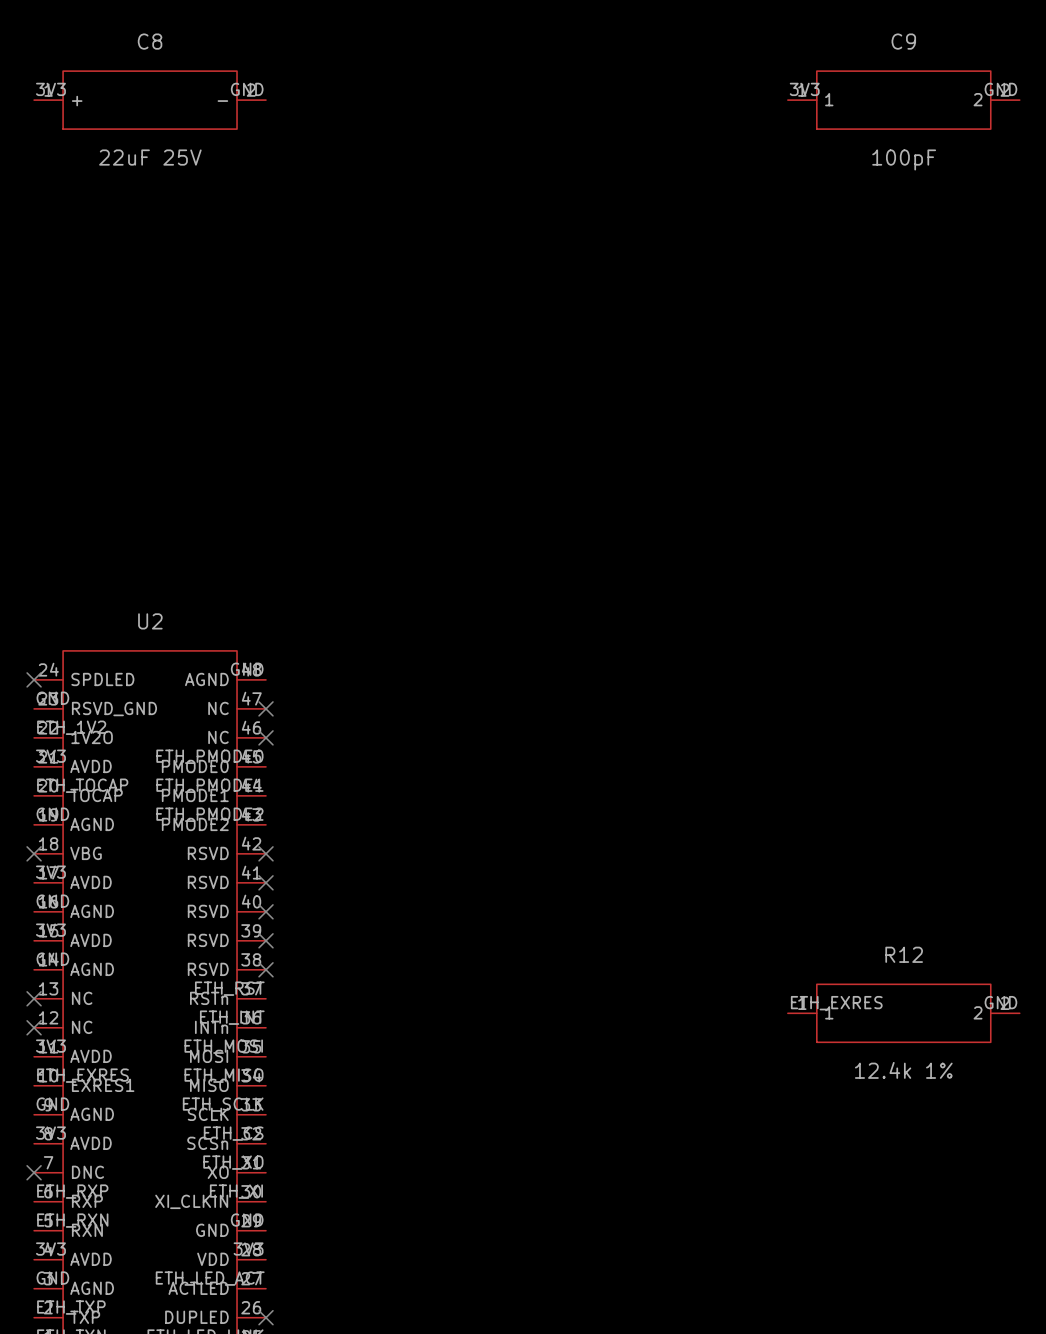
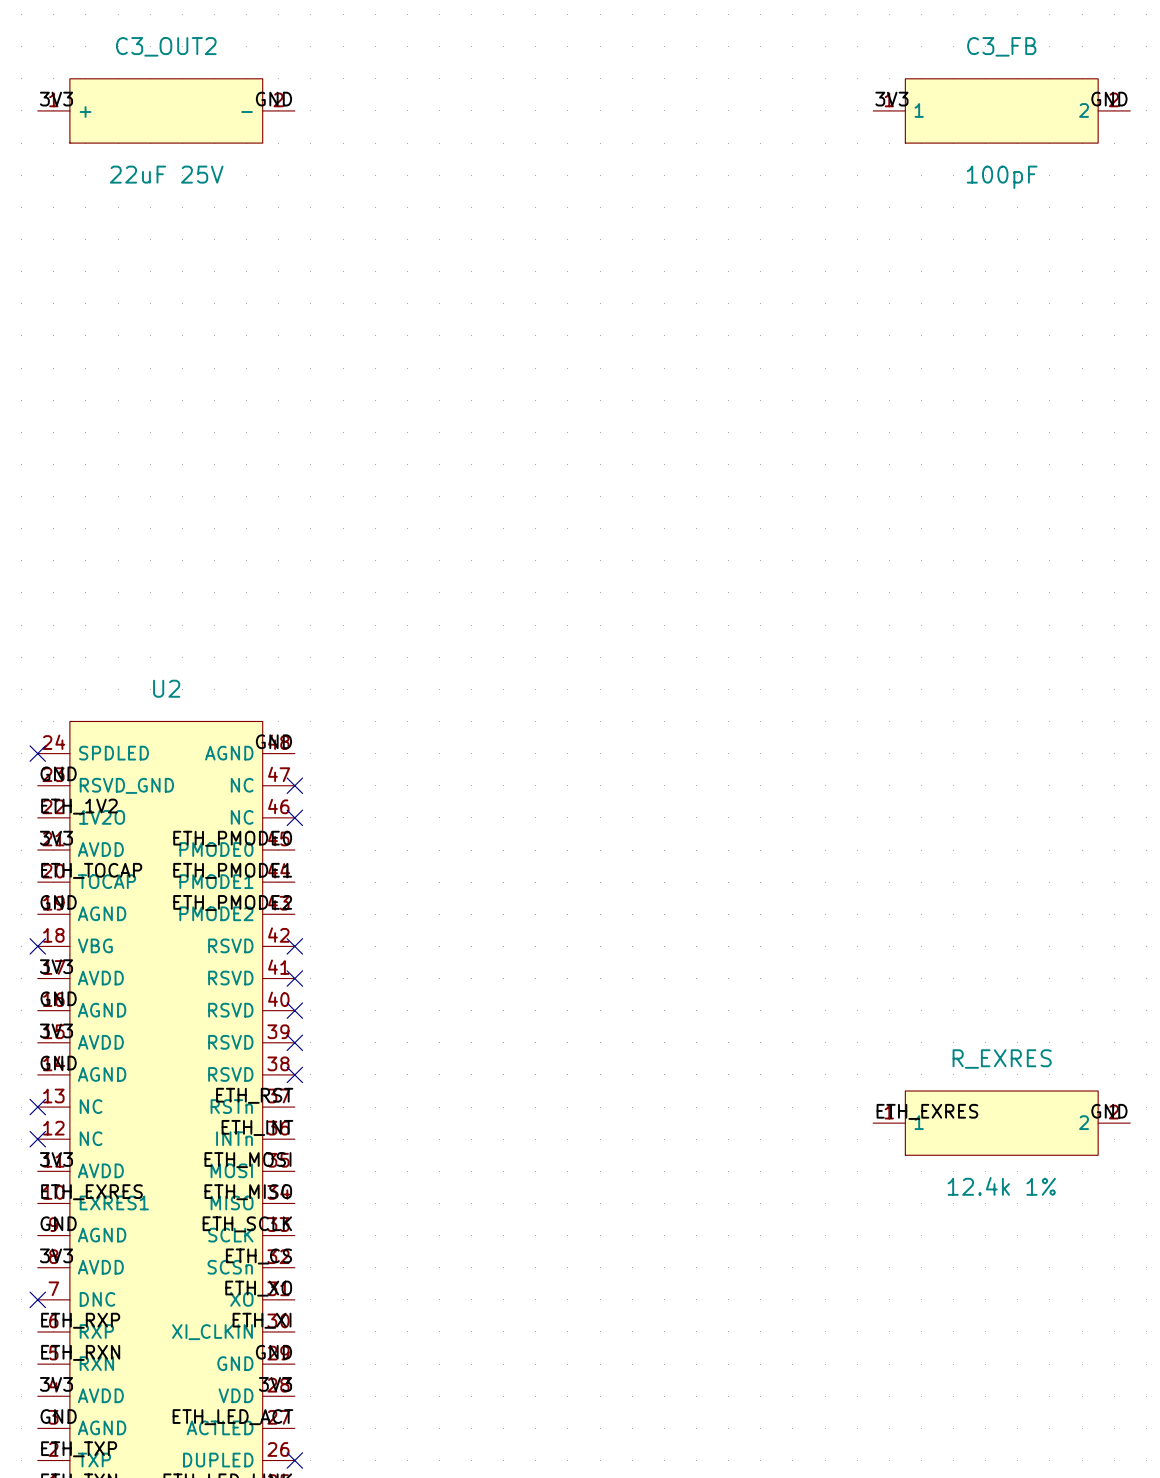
C8 name: C8 (150, 41) -> C3_OUT2 (166, 46)
C9 name: C9 (903, 41) -> C3_FB (1001, 46)
R12 name: R12 (904, 954) -> R_EXRES (1002, 1059)

